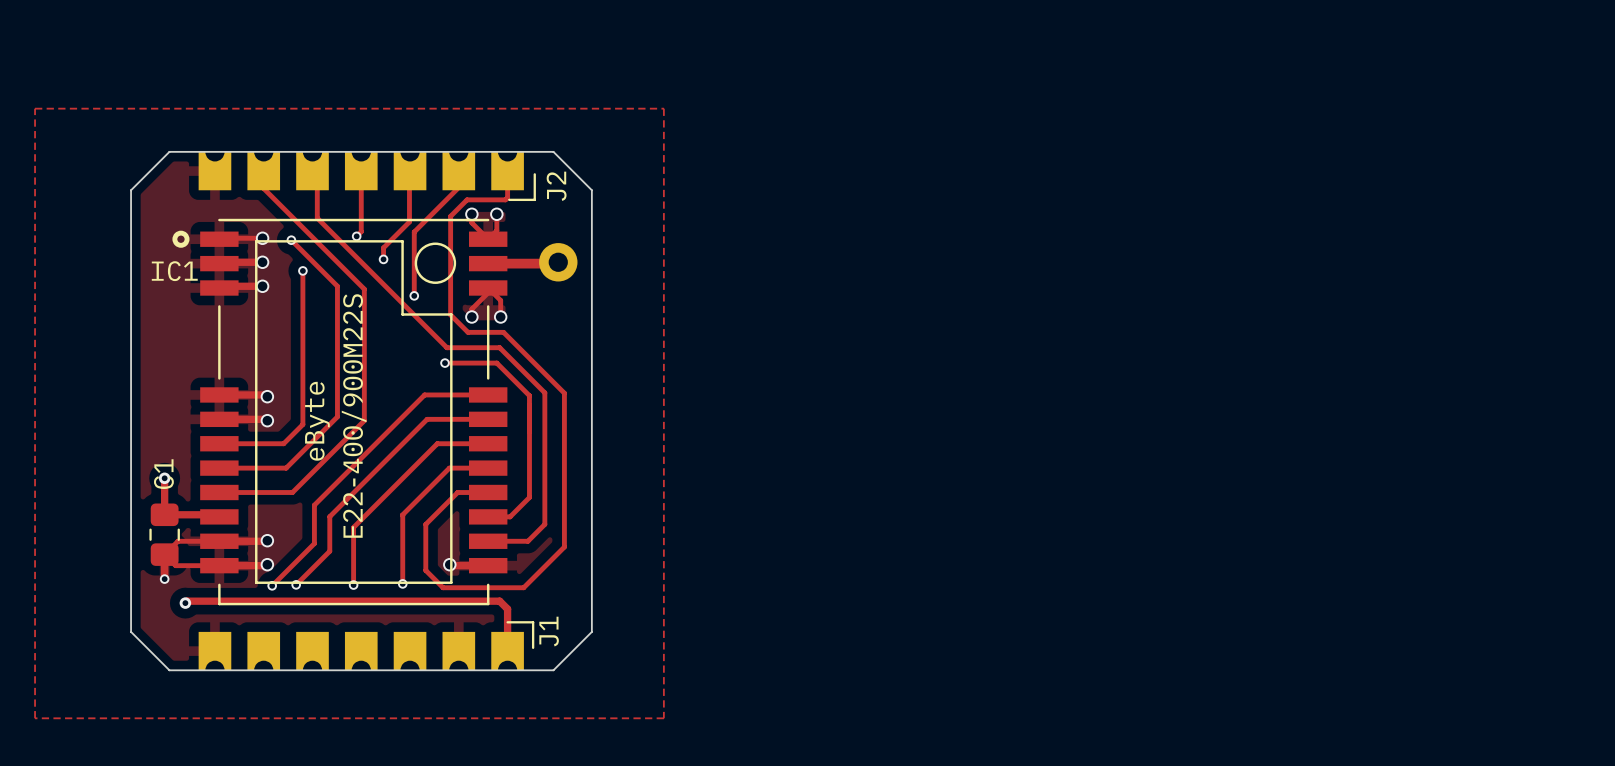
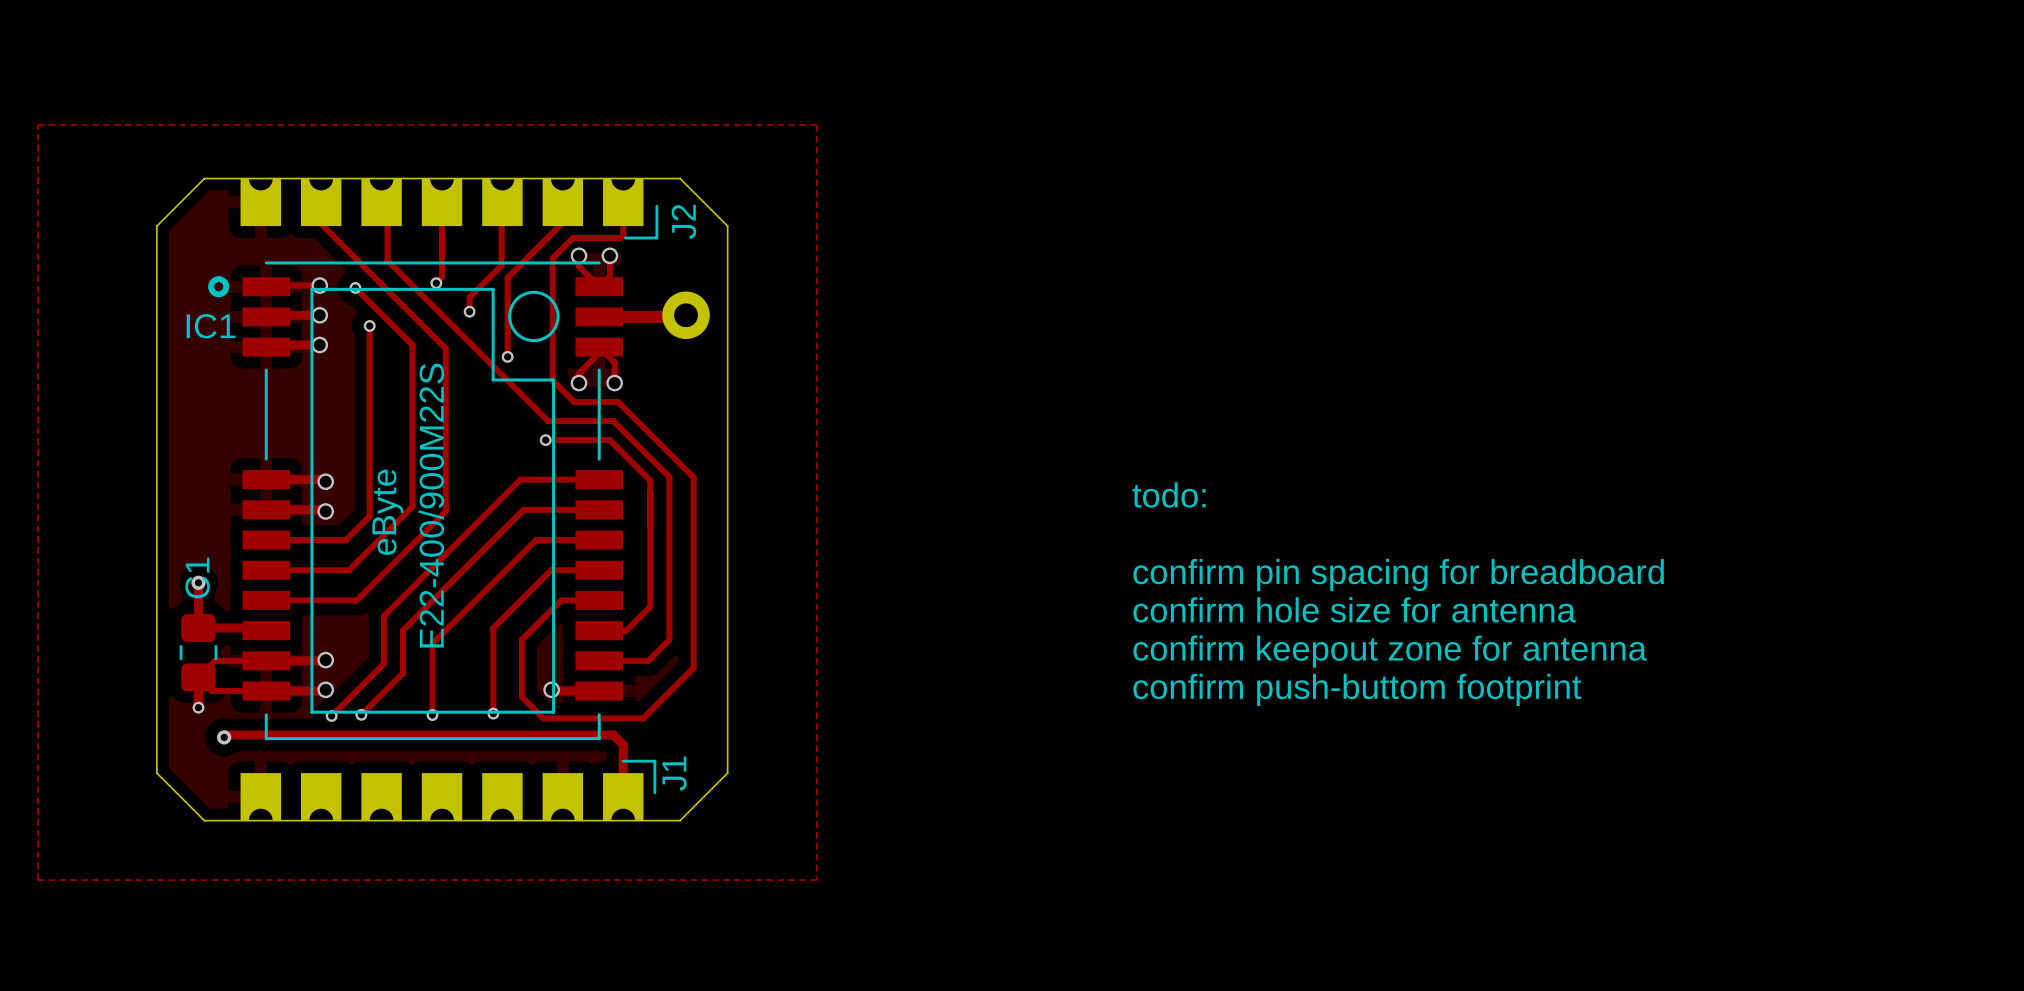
text: none -> todo: (1169, 495)
text: none -> confirm pin spacing for breadboard (1398, 575)
text: none -> confirm hole size for antenna (1354, 609)
text: none -> confirm keepout zone for antenna (1390, 651)
text: none -> confirm push-buttom footprint (1357, 689)

